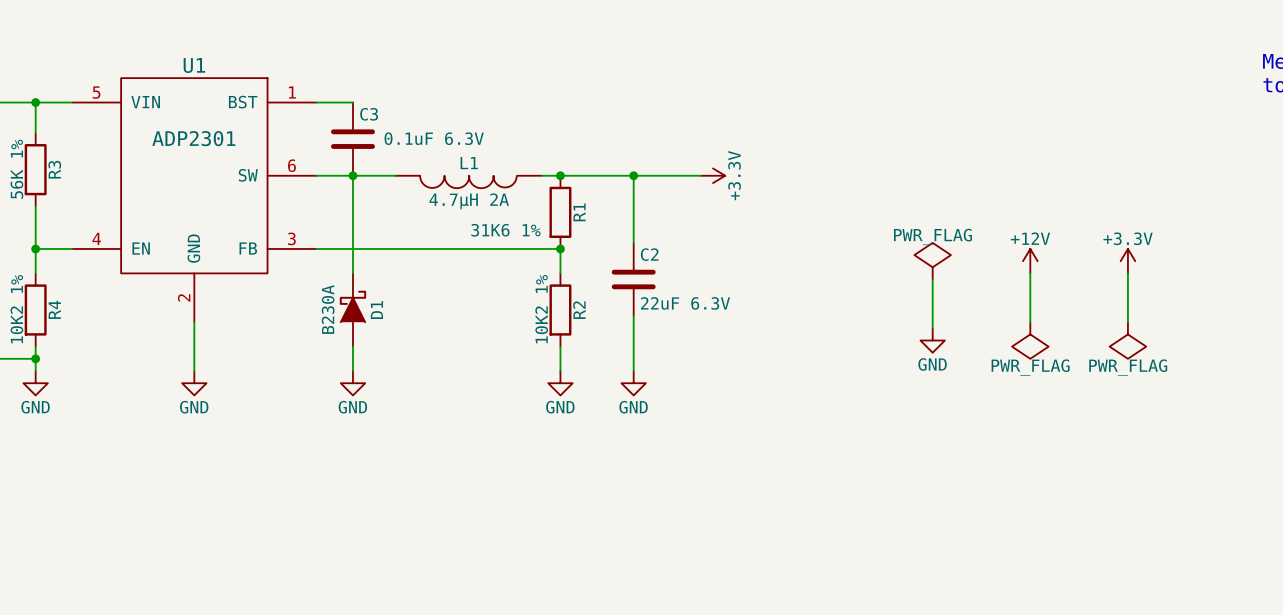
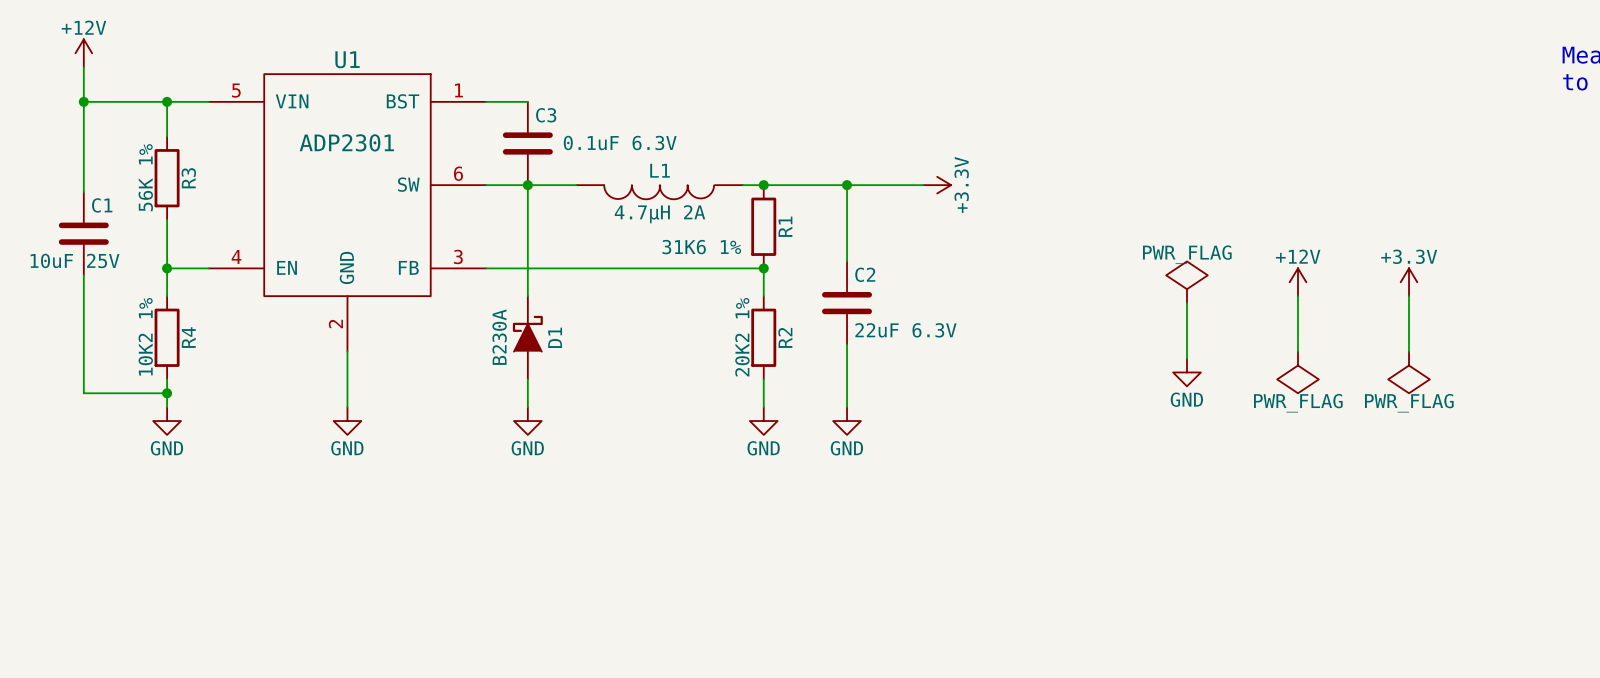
R2 value: 10K2 1% (541, 309) -> 20K2 1% (742, 337)

